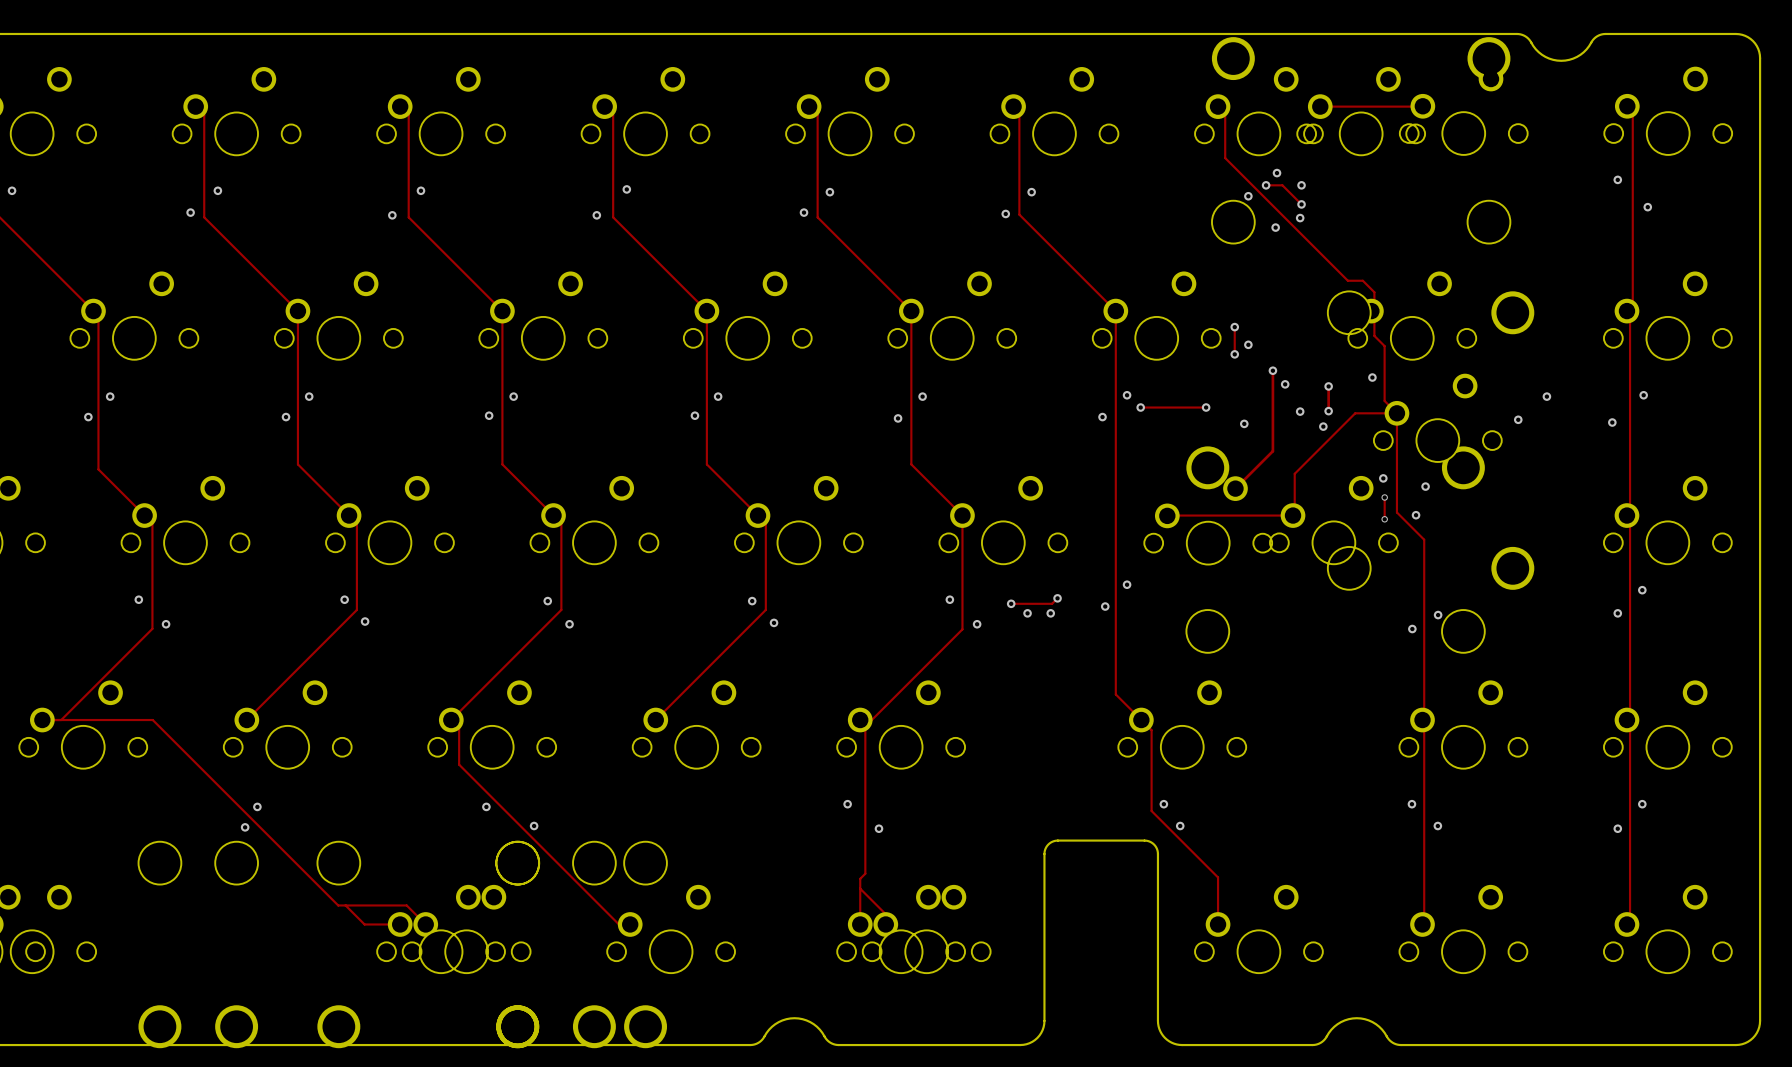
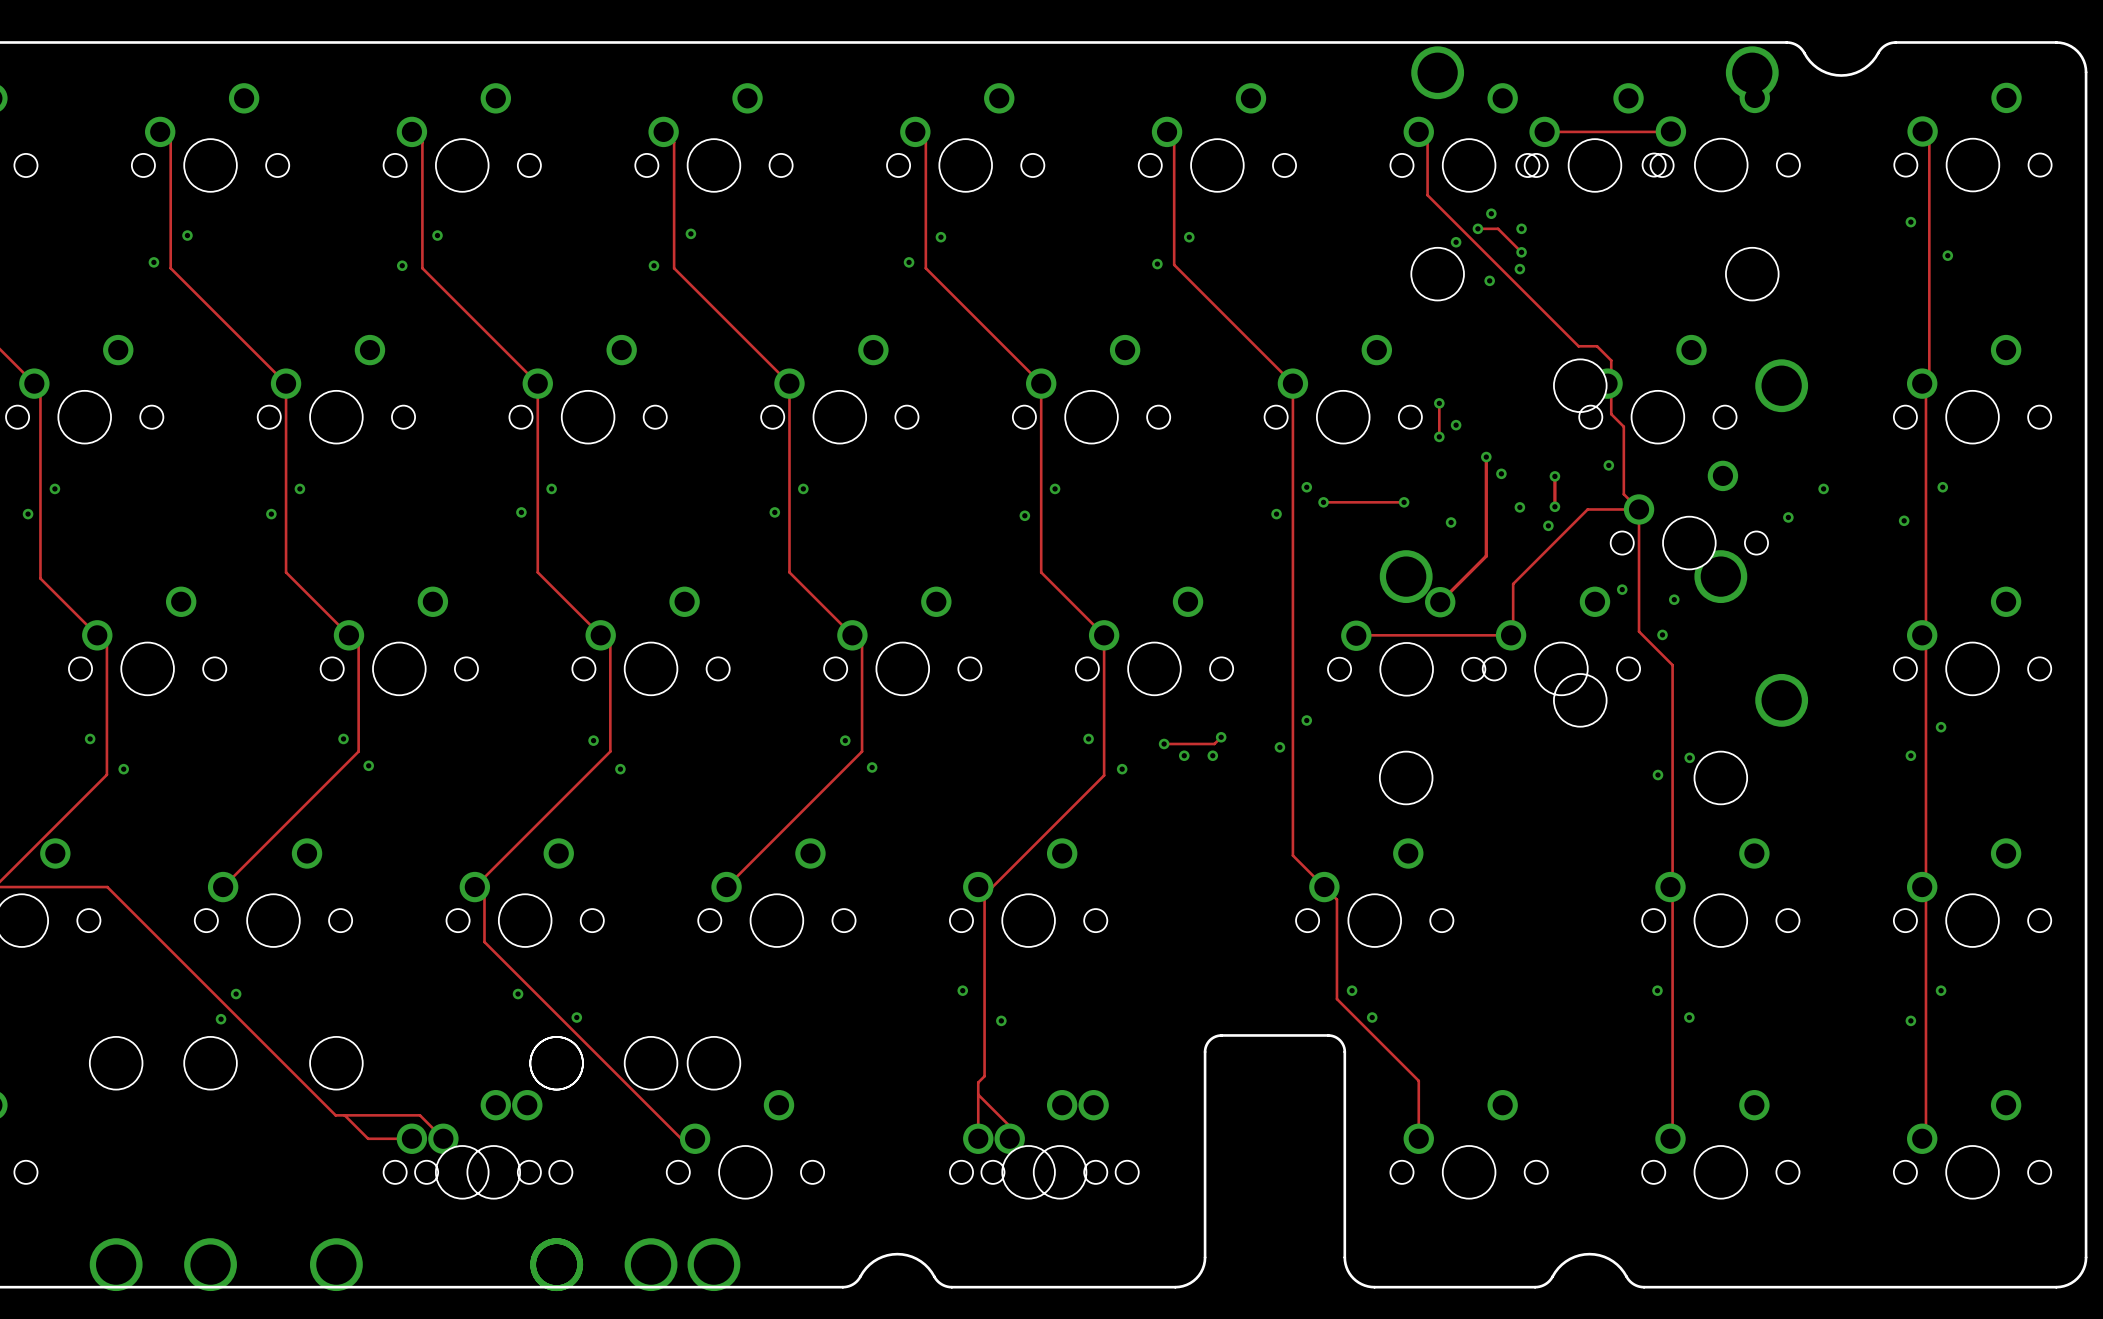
track: (1384, 497) (1384, 519) -> none
via: (1384, 497) -> none
via: (1384, 519) -> none

